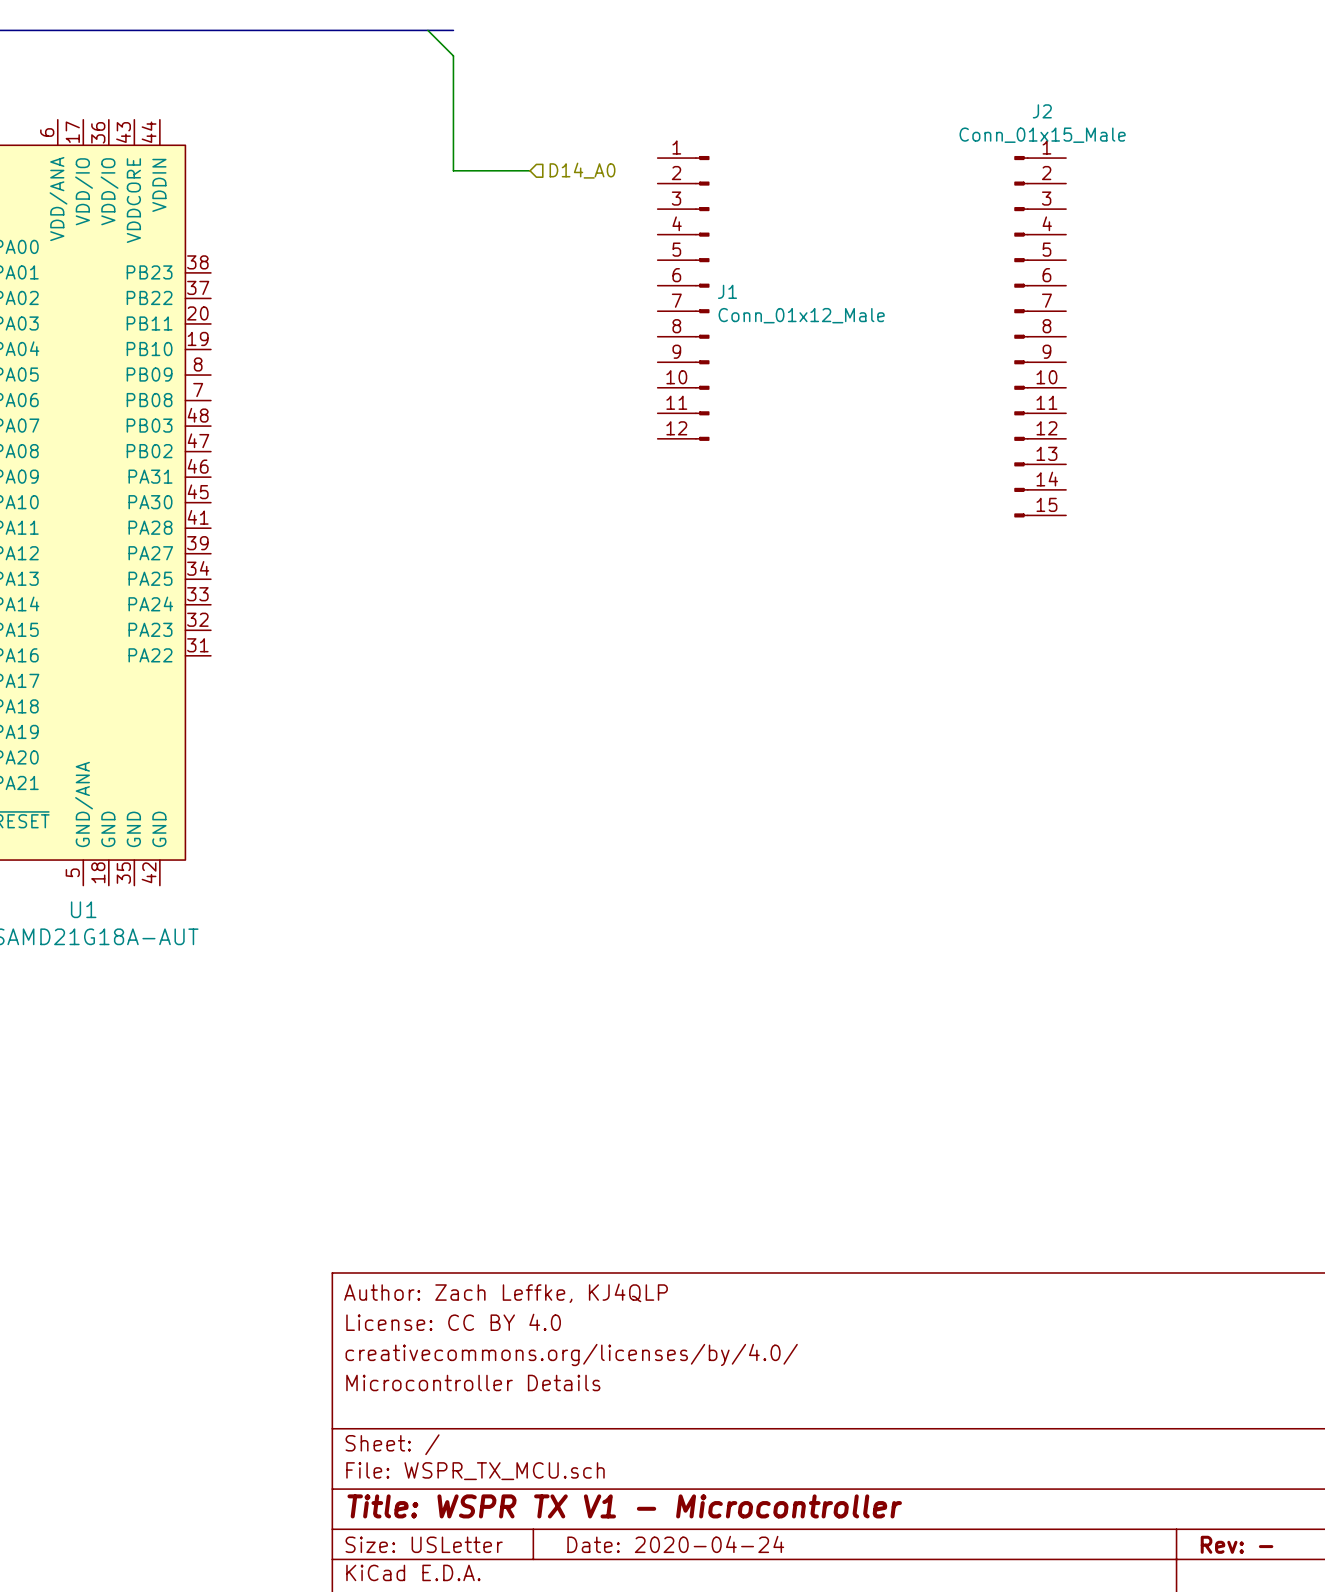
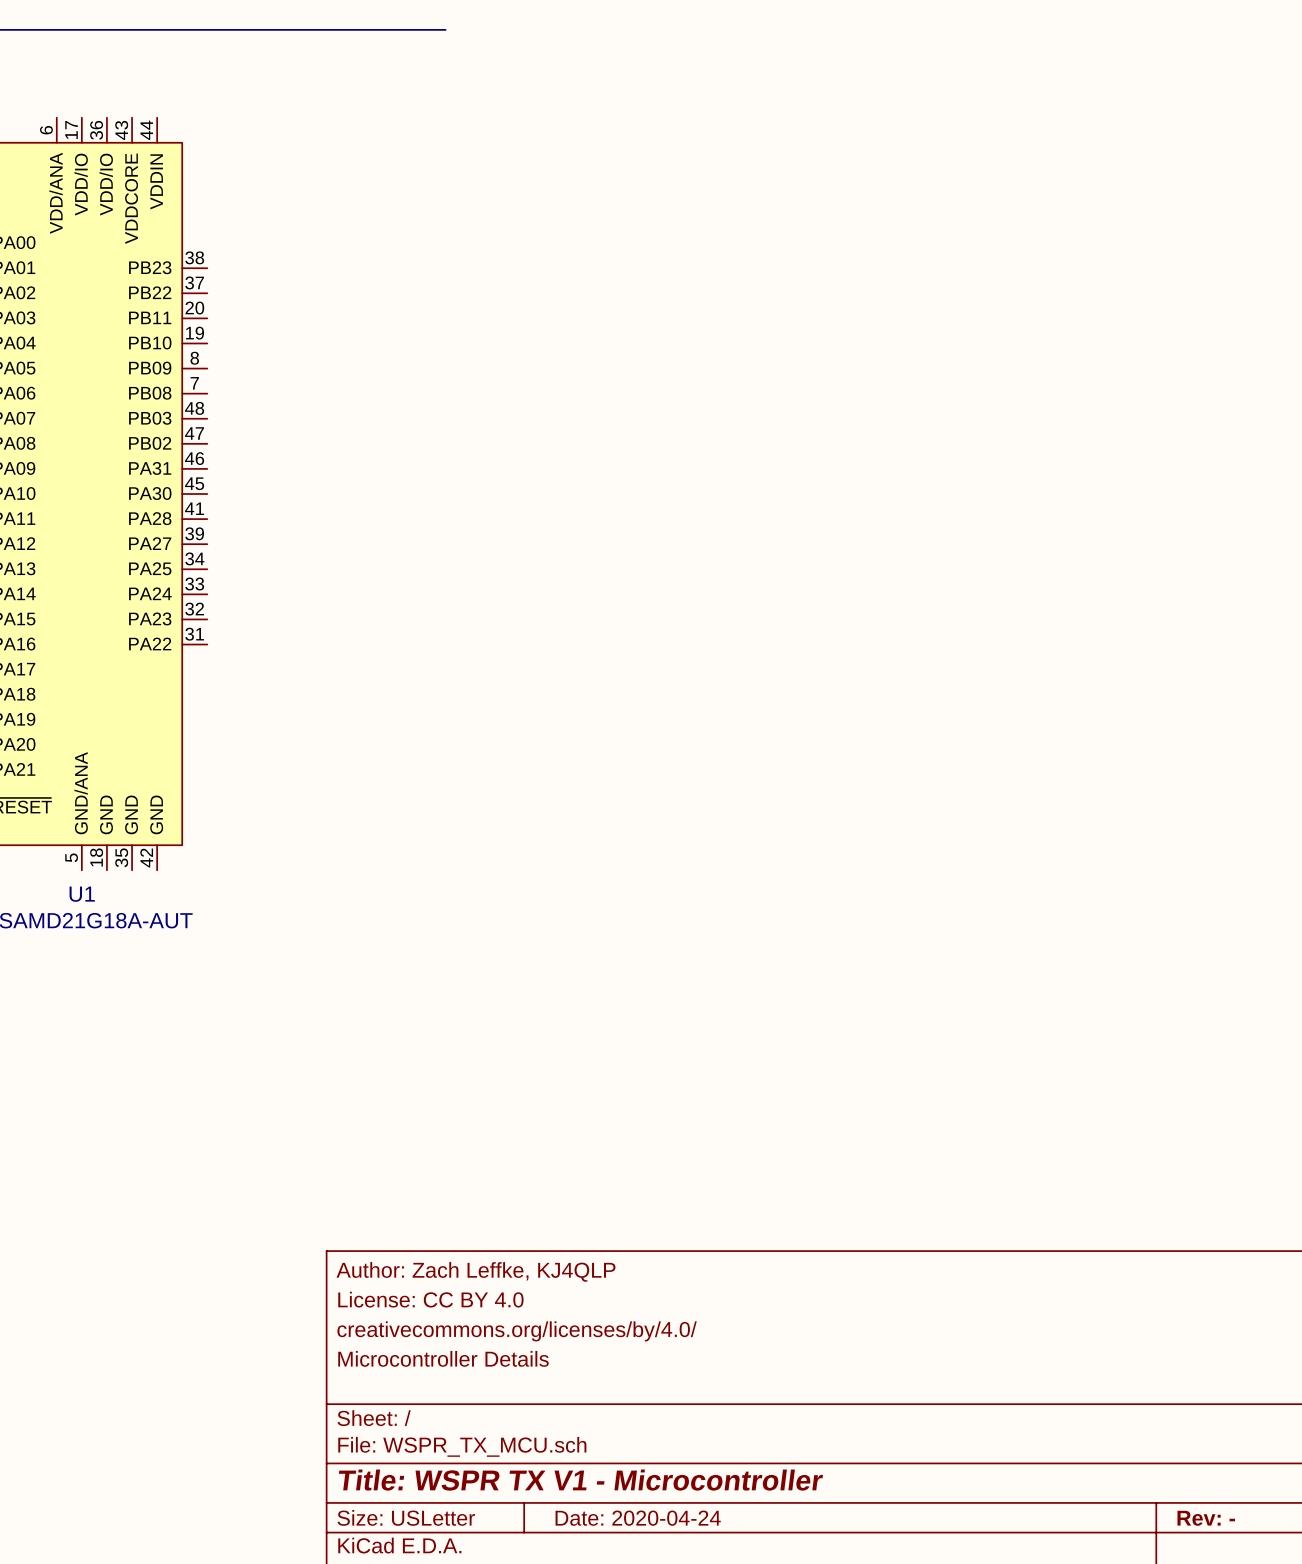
wire: (427, 30) (453, 55) (453, 170) (530, 170) -> none
hierarchical label: D14_A0 (582, 170) -> none
J1: Conn_01x12_Male (683, 298) -> none
J2: Conn_01x15_Male (1040, 336) -> none

